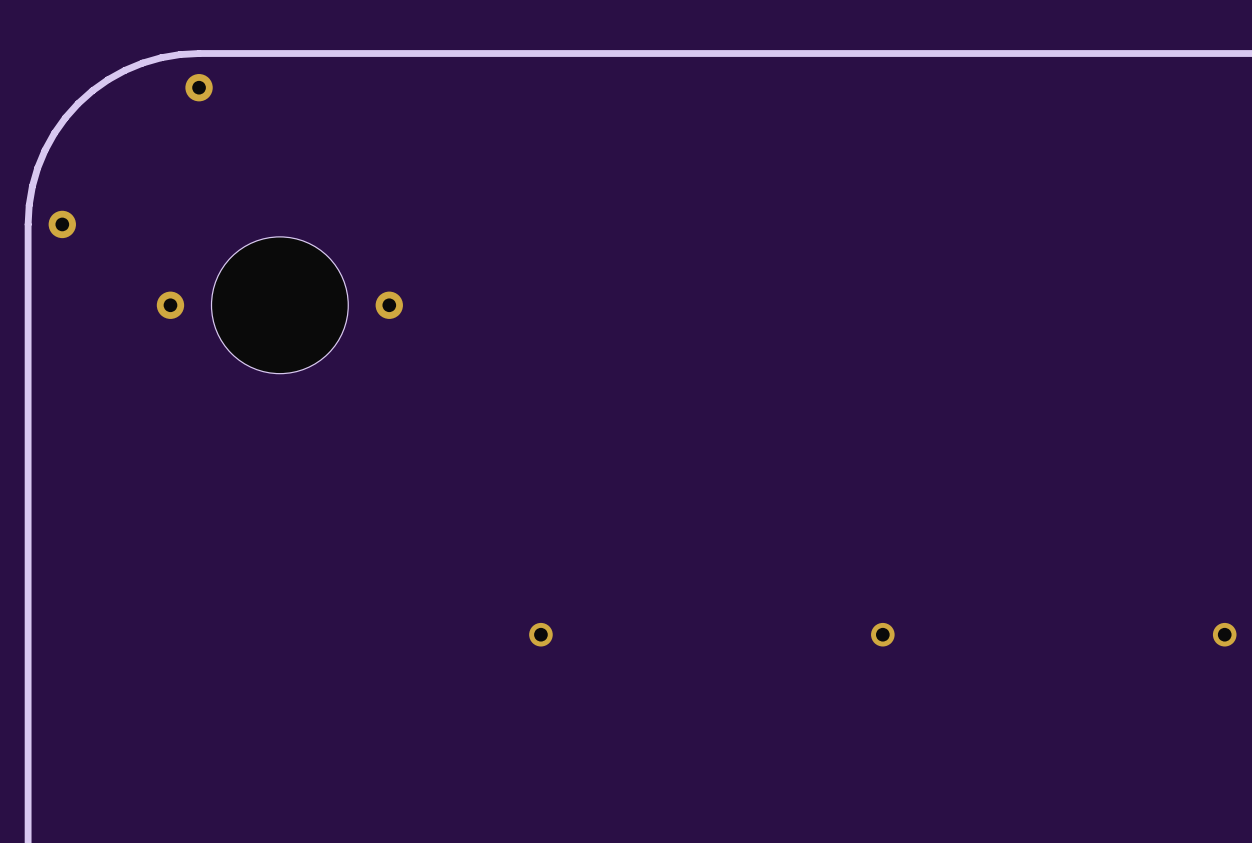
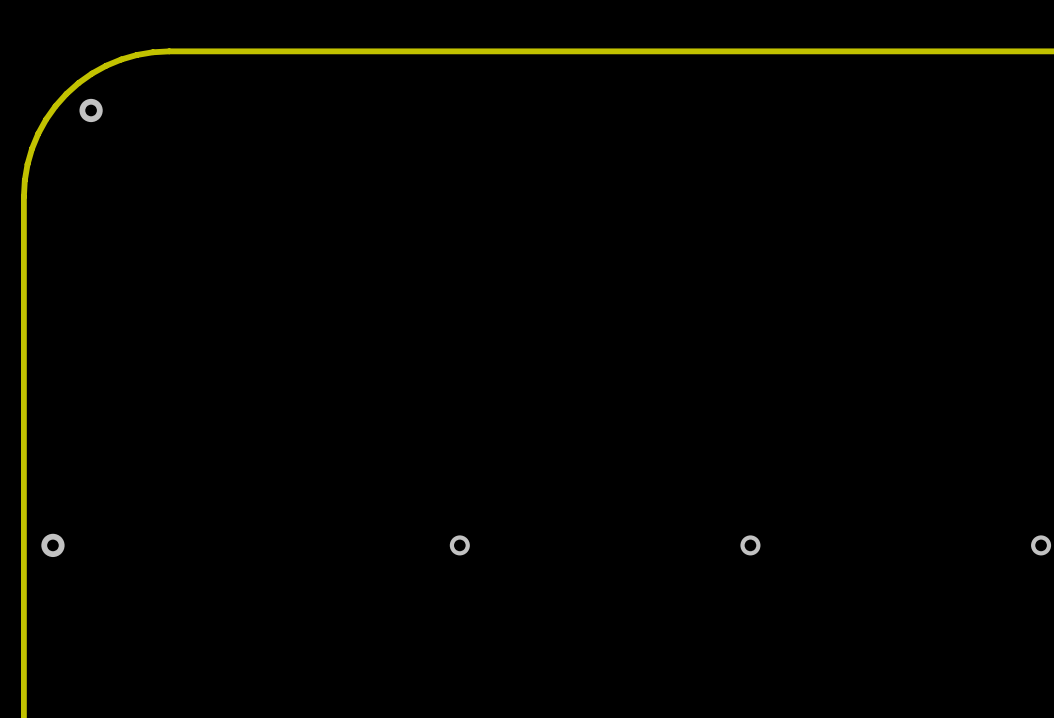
via: (199, 87) -> none
via: none -> (91, 110)
via: (62, 224) -> none
via: (170, 305) -> none
part: (279, 305) -> none
via: (389, 305) -> none
via: none -> (52, 545)

